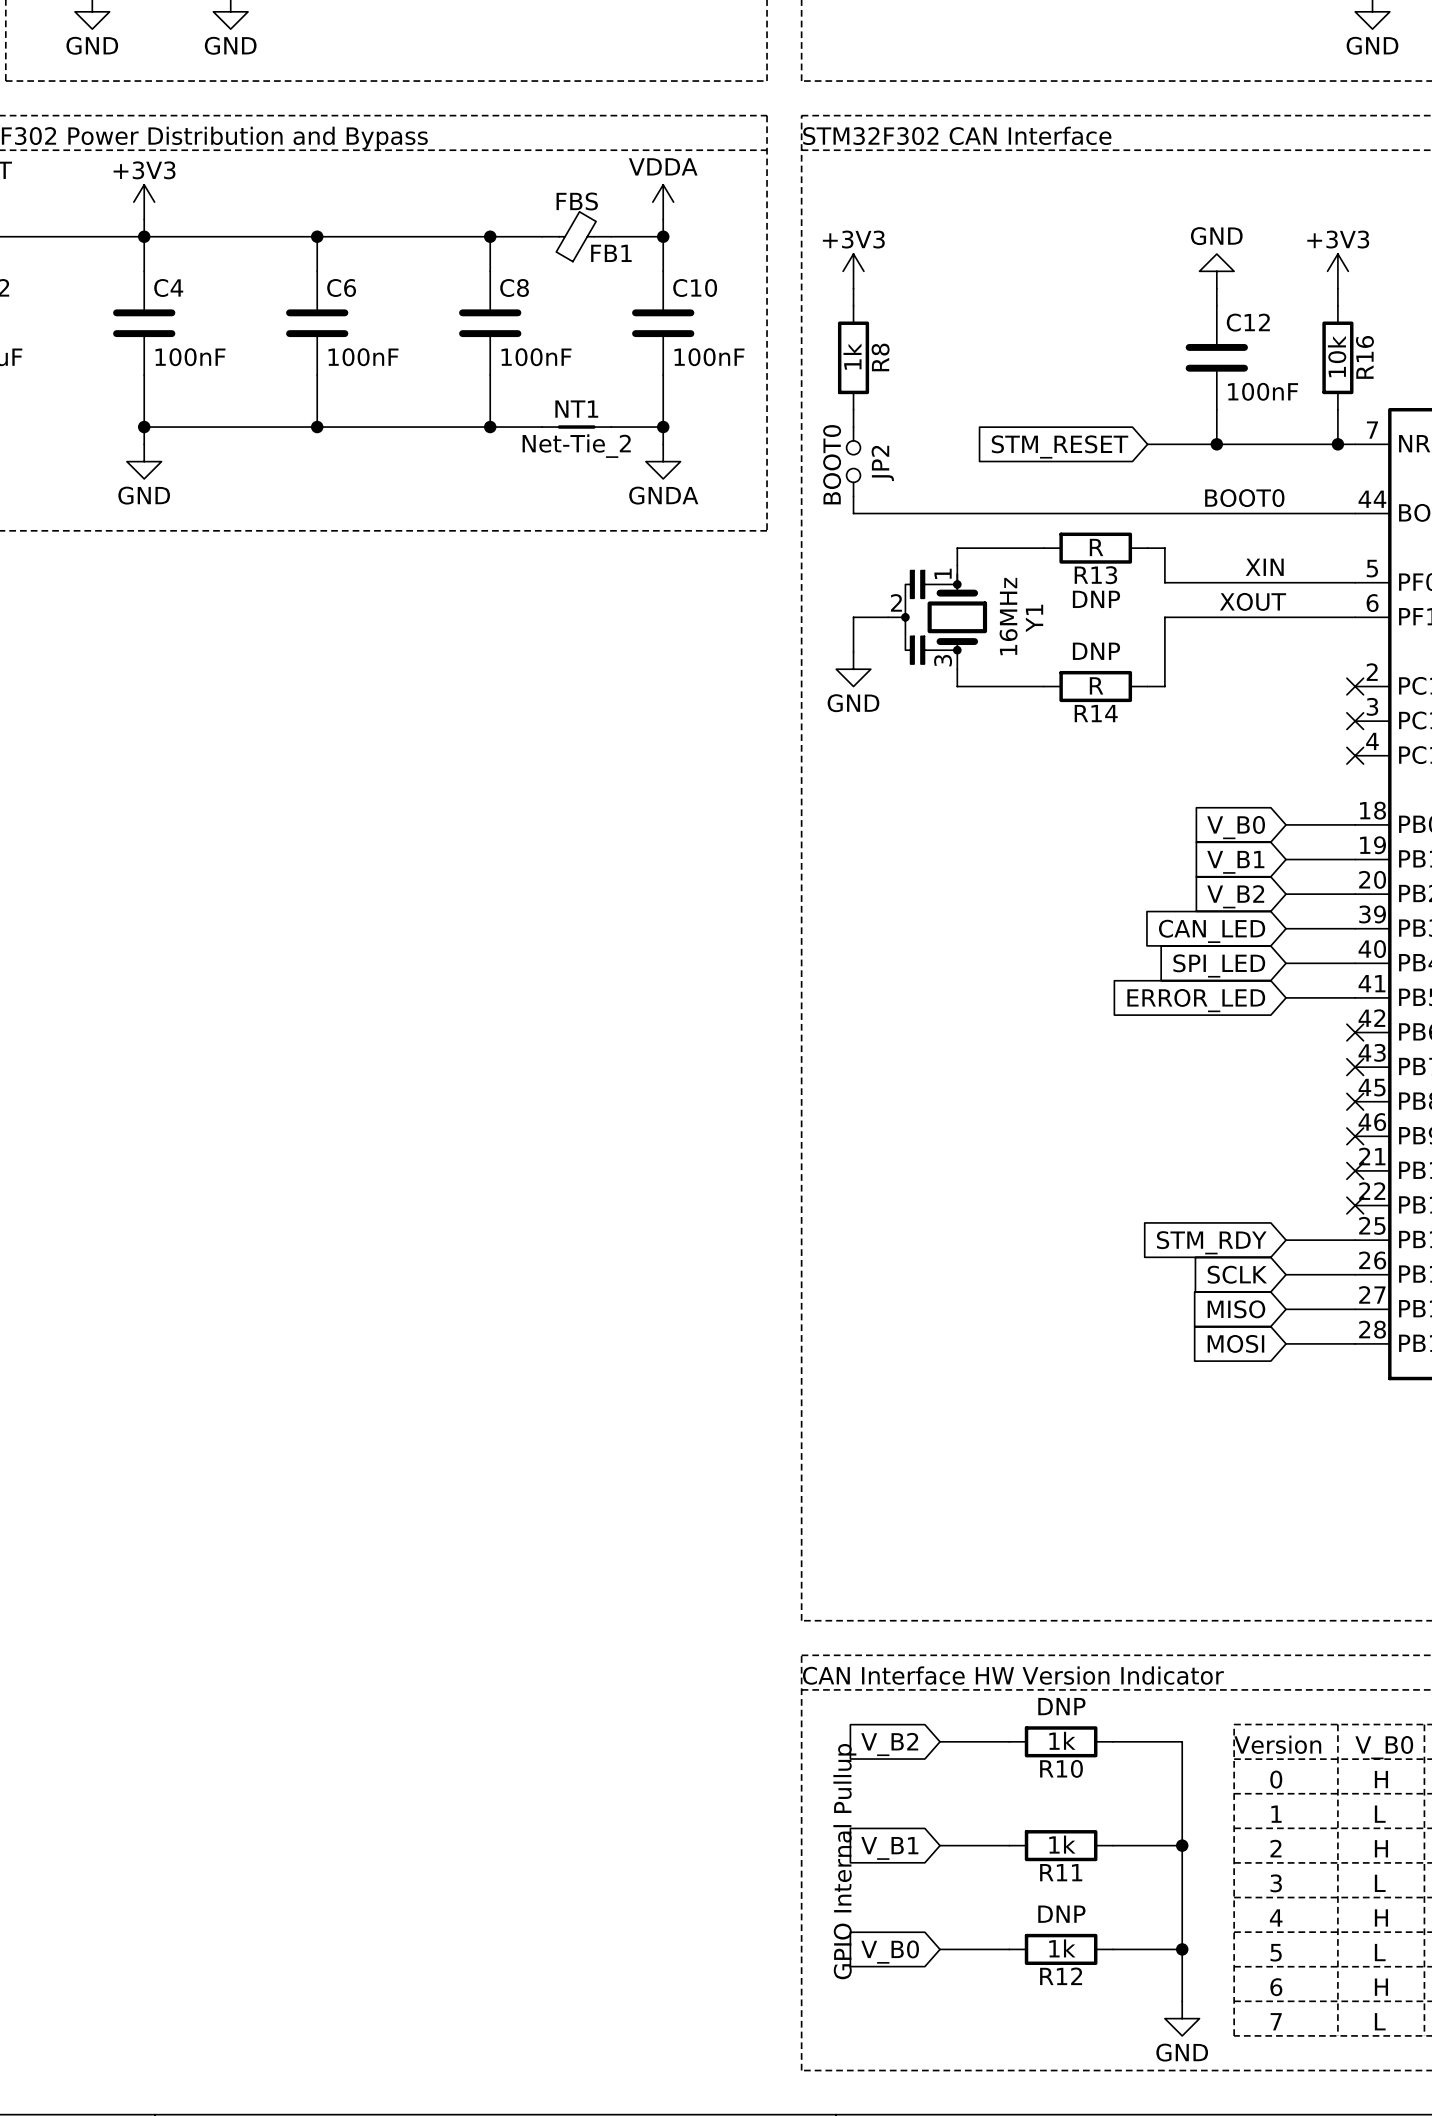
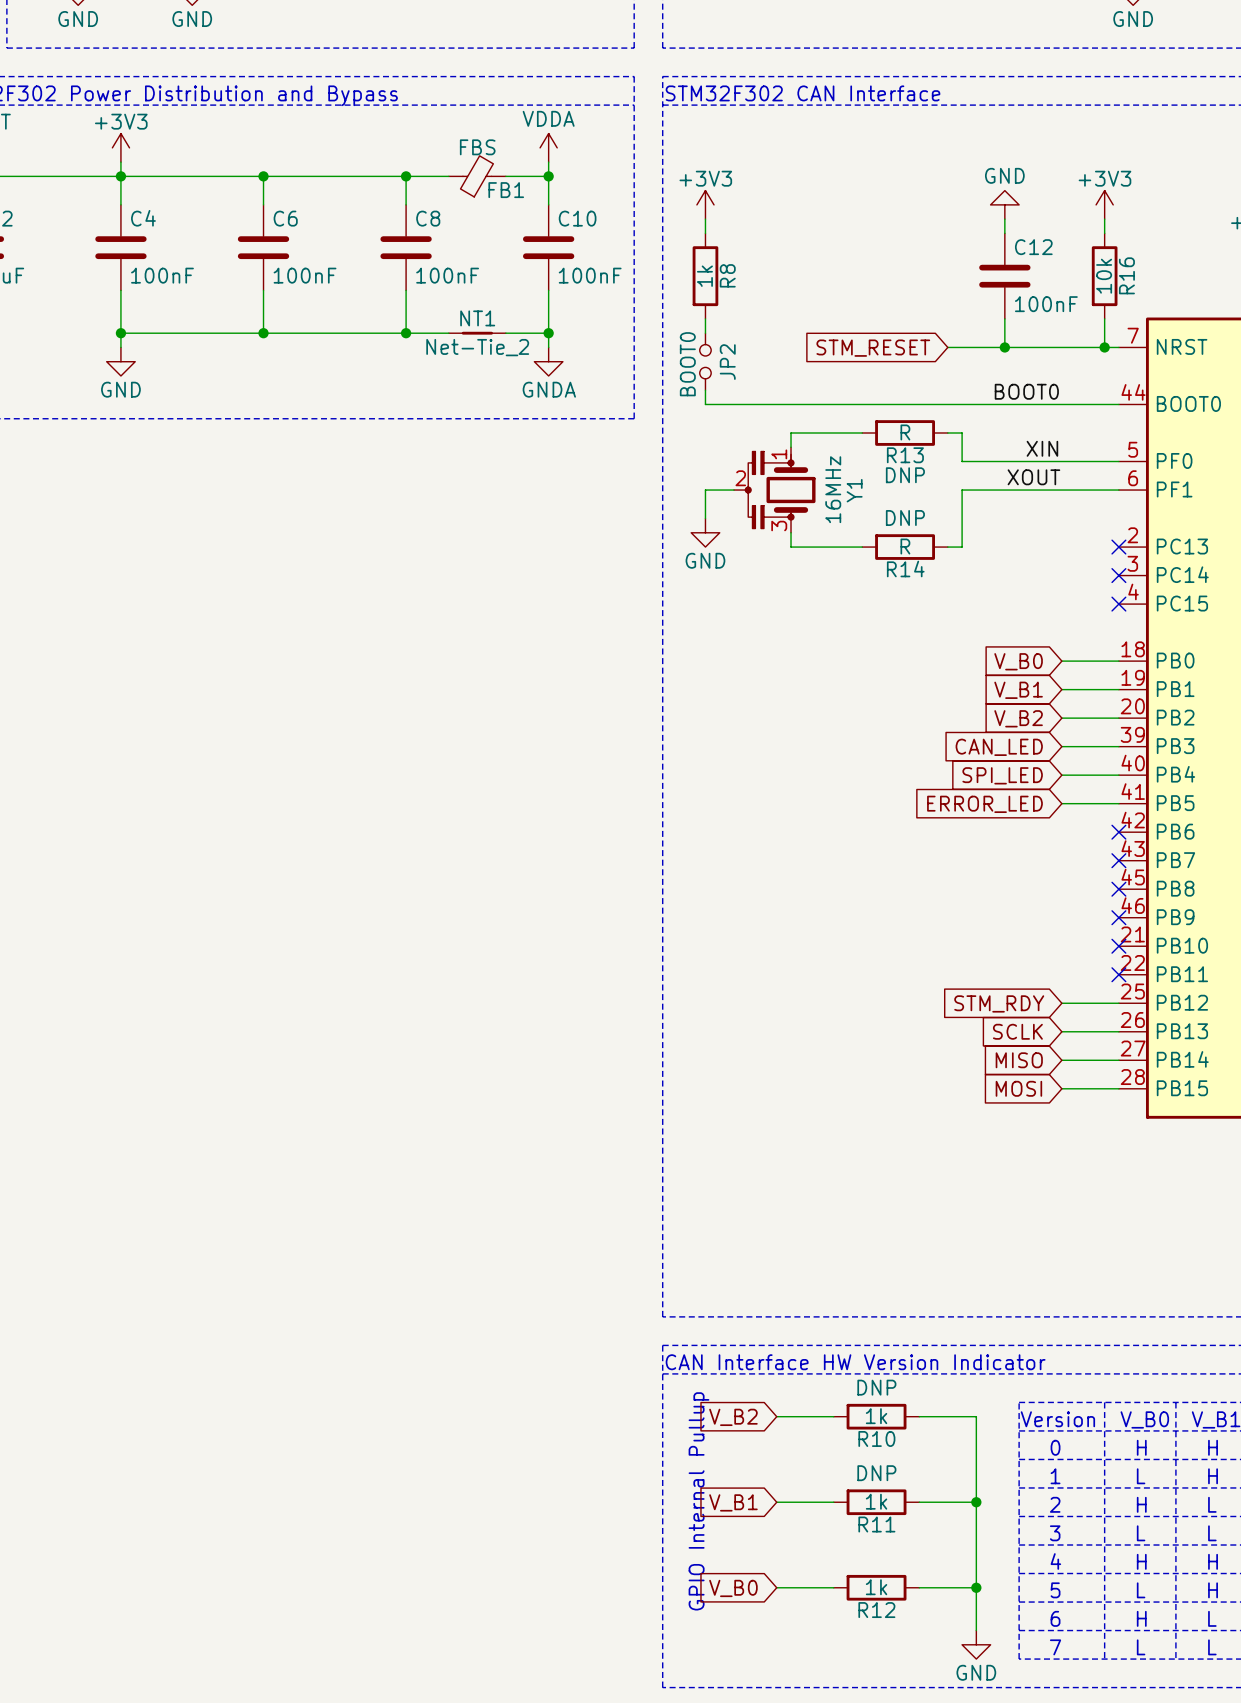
R11 text: none -> DNP (876, 1473)
R12 text: DNP (1061, 1914) -> none

